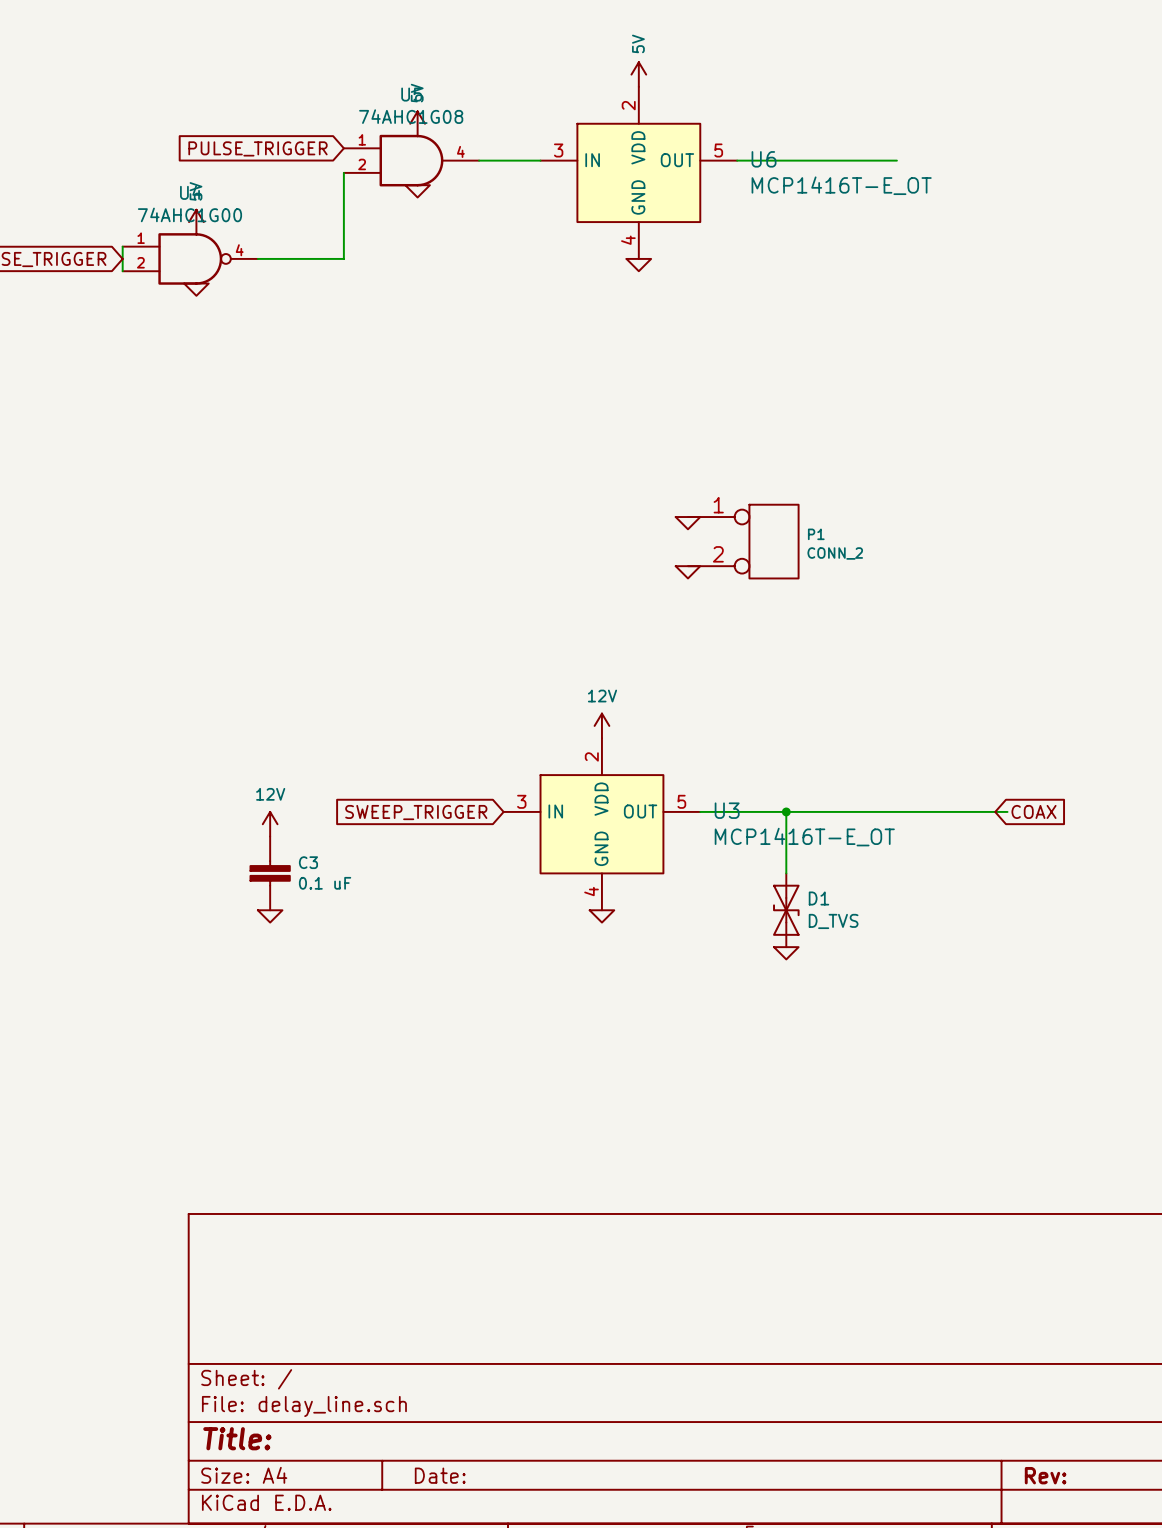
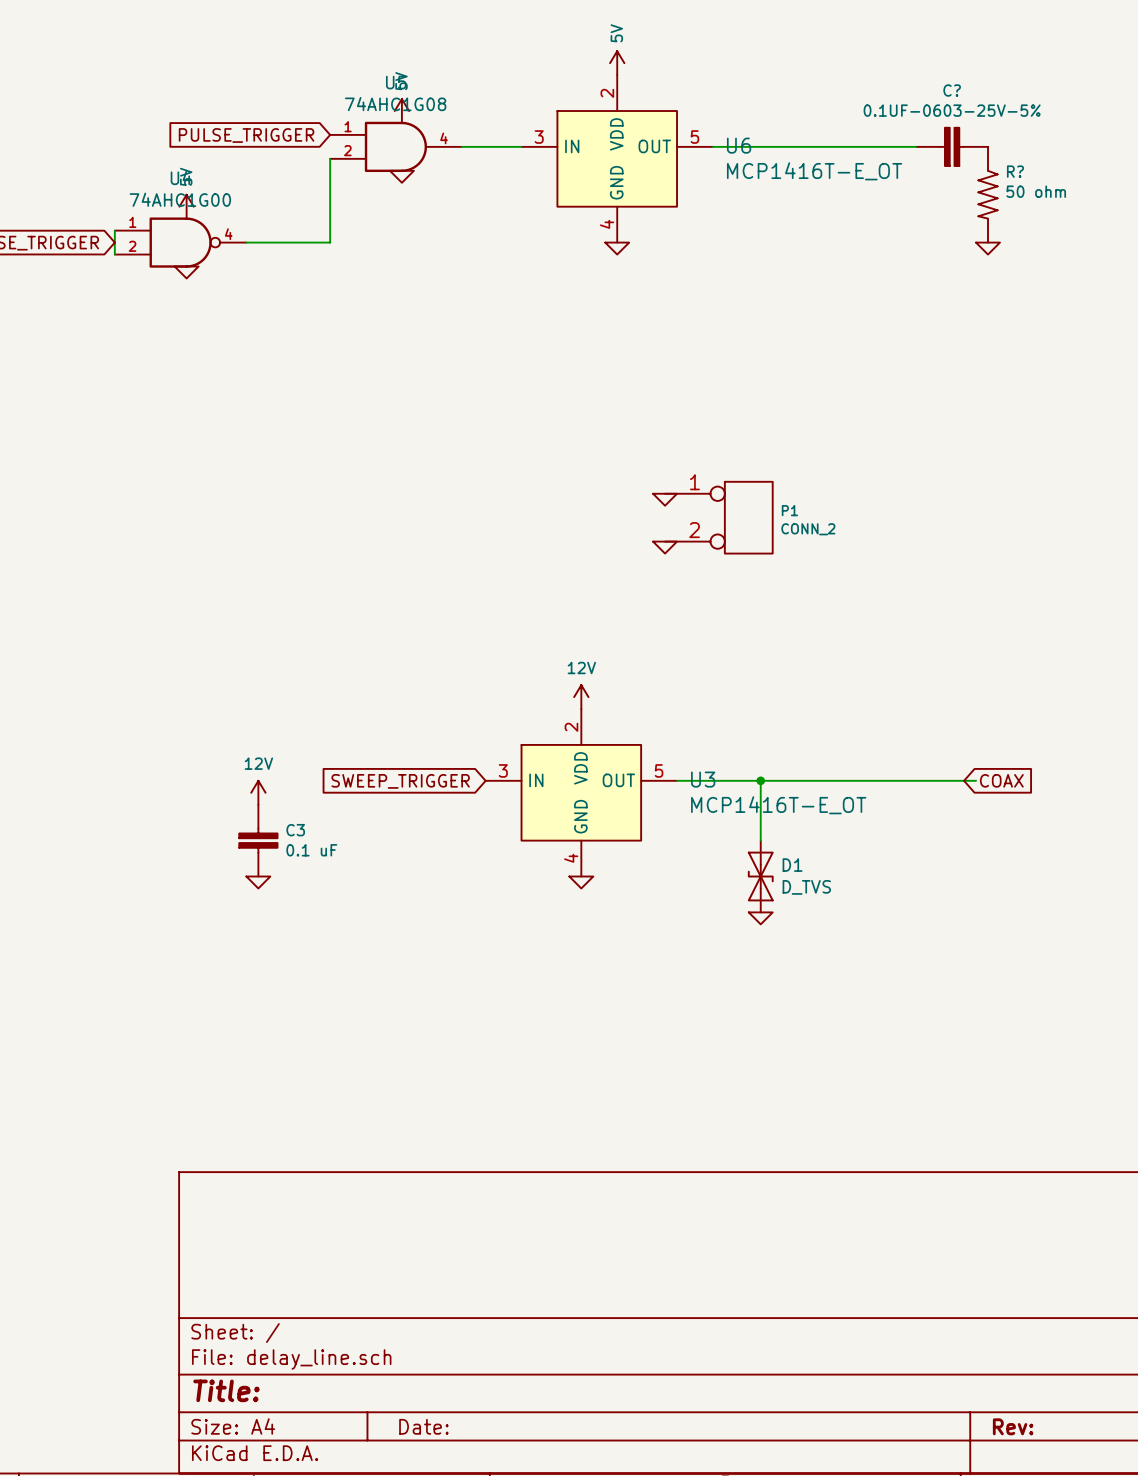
wire: none -> (868, 146) (916, 146)
C?: none -> 0.1UF-0603-25V-5% (952, 146)
R?: none -> 50 ohm (988, 194)
power symbol: none -> (988, 248)

